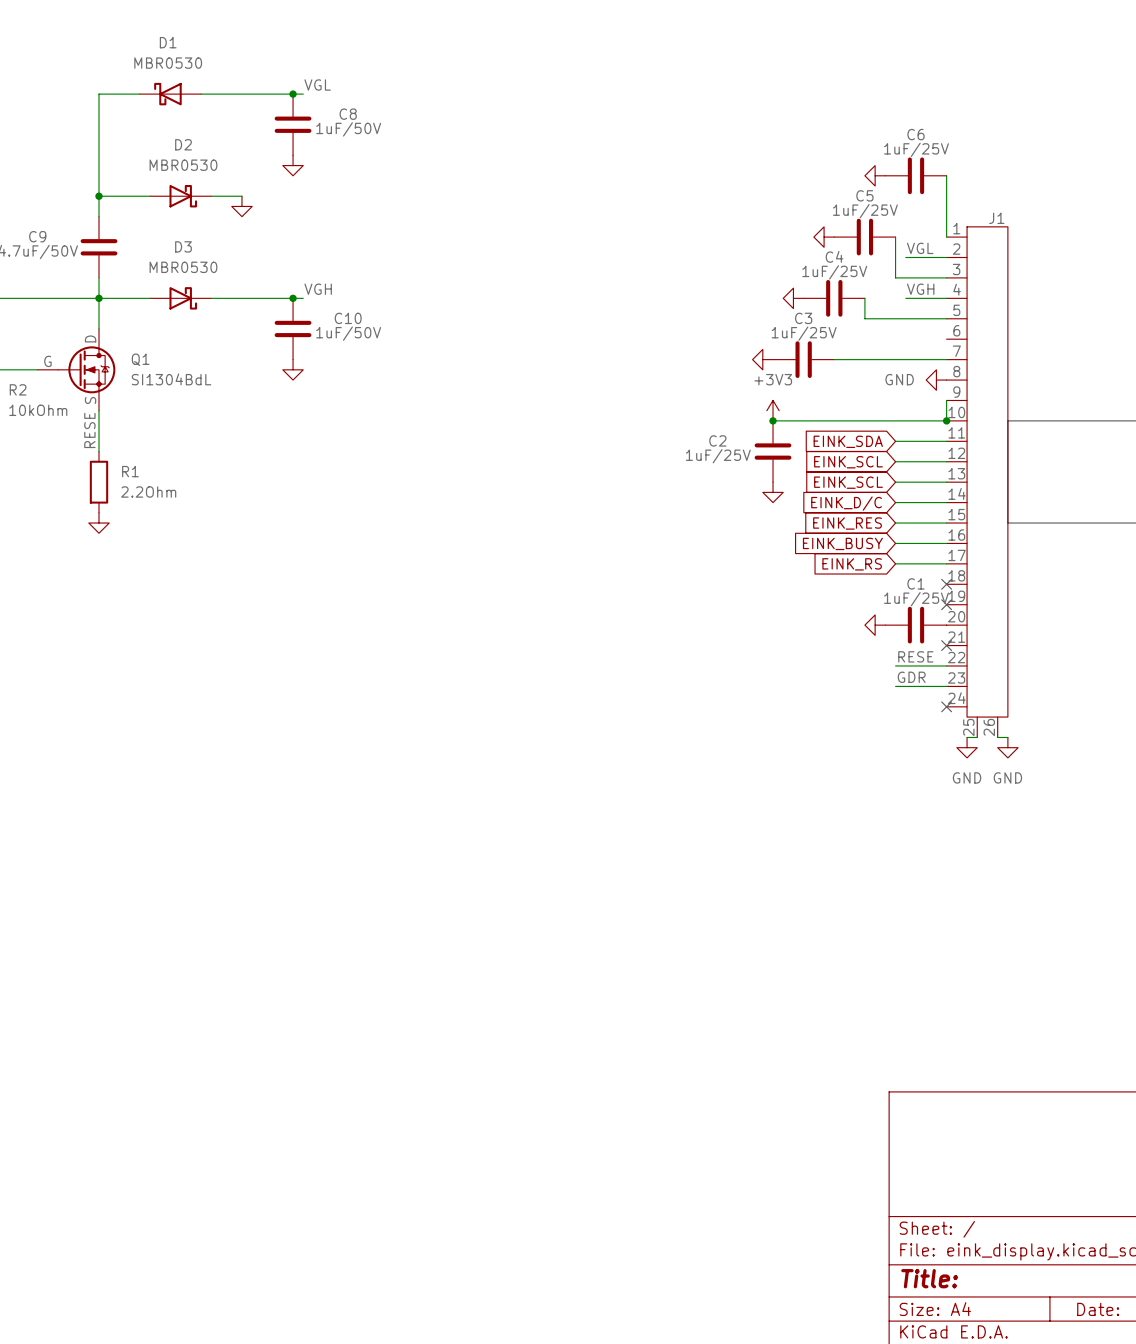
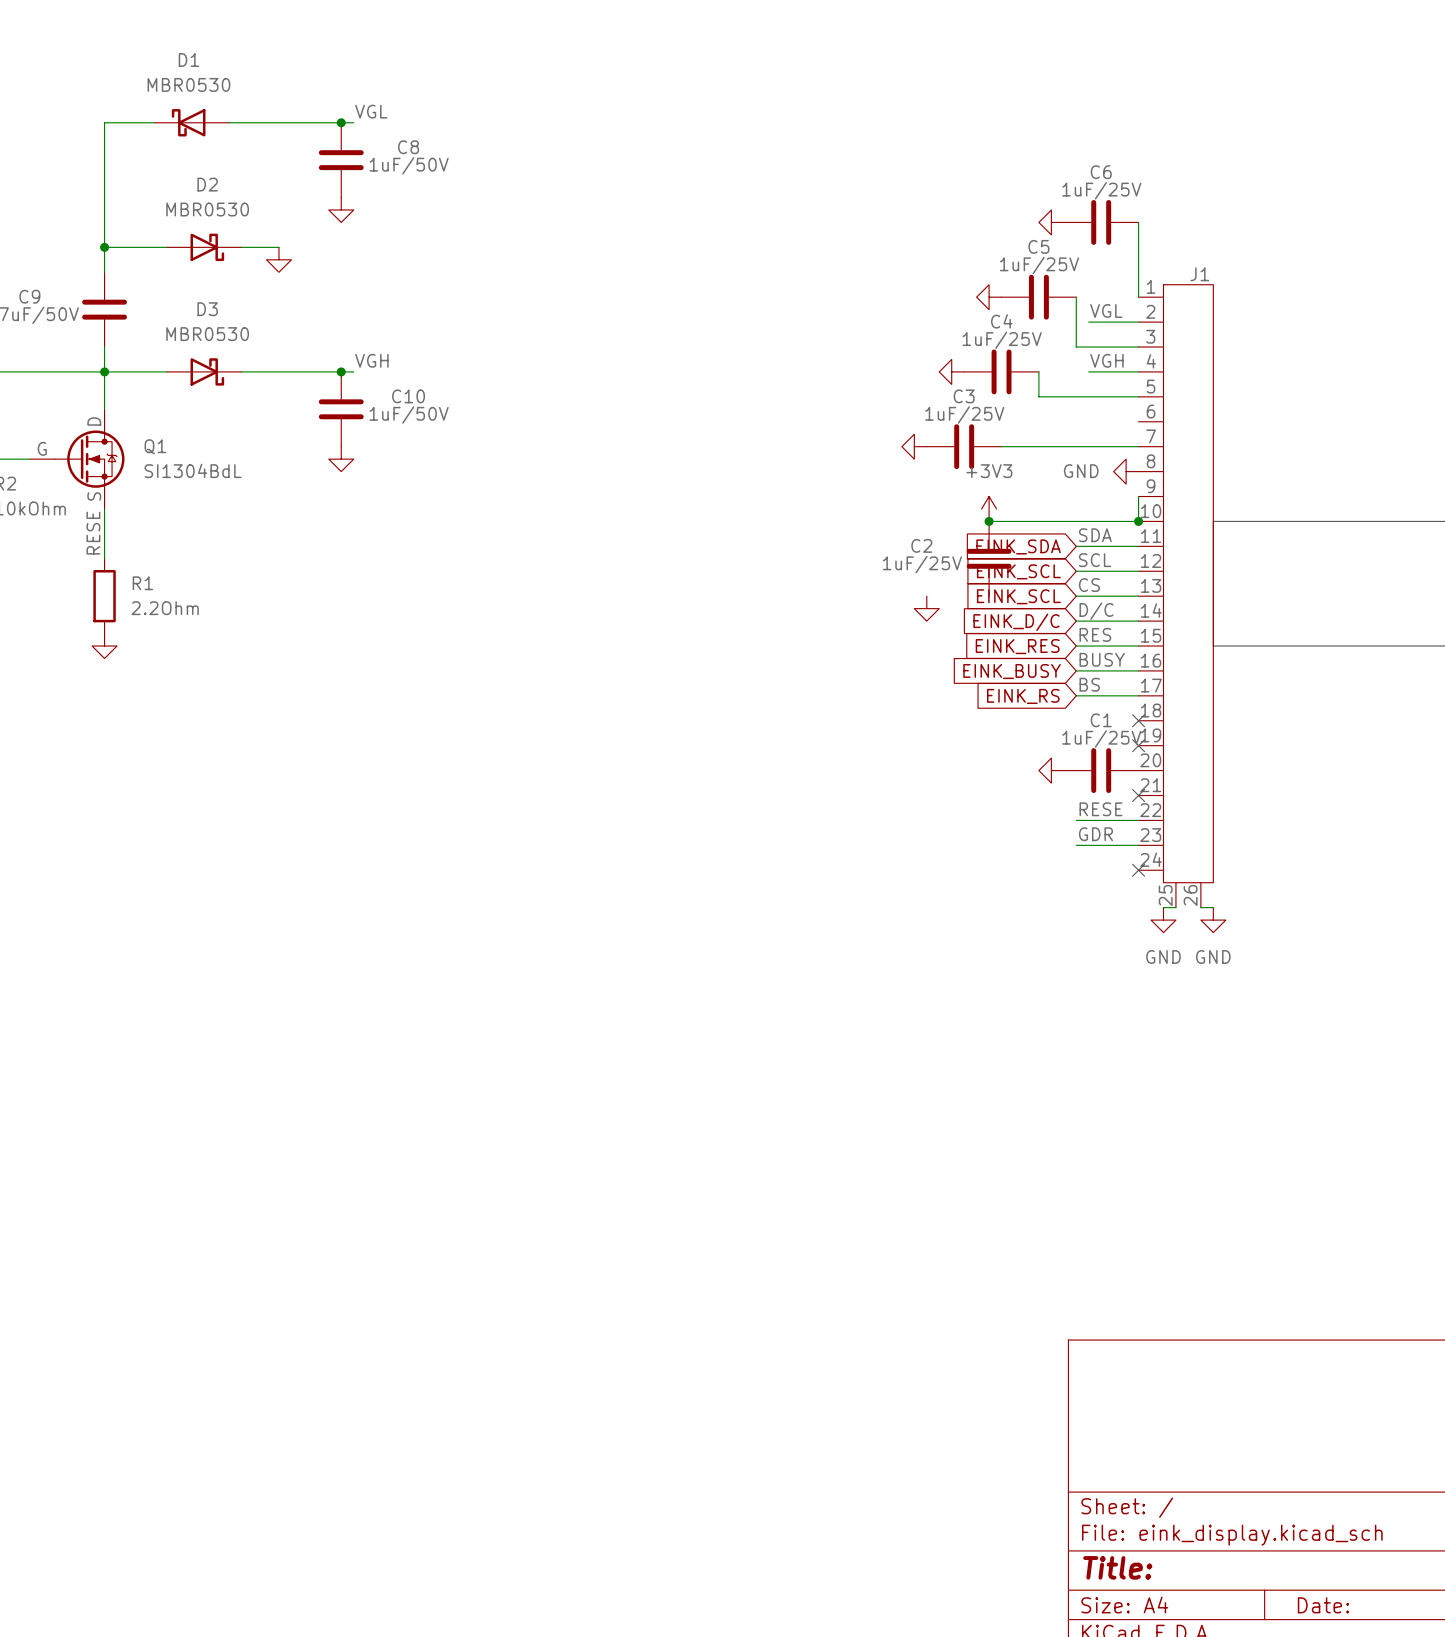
power symbol position: +3V3 (773, 410) -> +3V3 (989, 508)
wire: (773, 420) (824, 420) -> none
junction: (773, 420) -> none
junction: none -> (989, 521)
label: none -> SDA (1095, 535)
C2 position: (773, 451) -> (989, 558)
label: none -> SCL (1095, 560)
label: none -> CS (1089, 585)
label: none -> D/C (1096, 611)
label: none -> RES (1095, 634)
label: none -> BUSY (1102, 659)
label: none -> BS (1089, 684)

